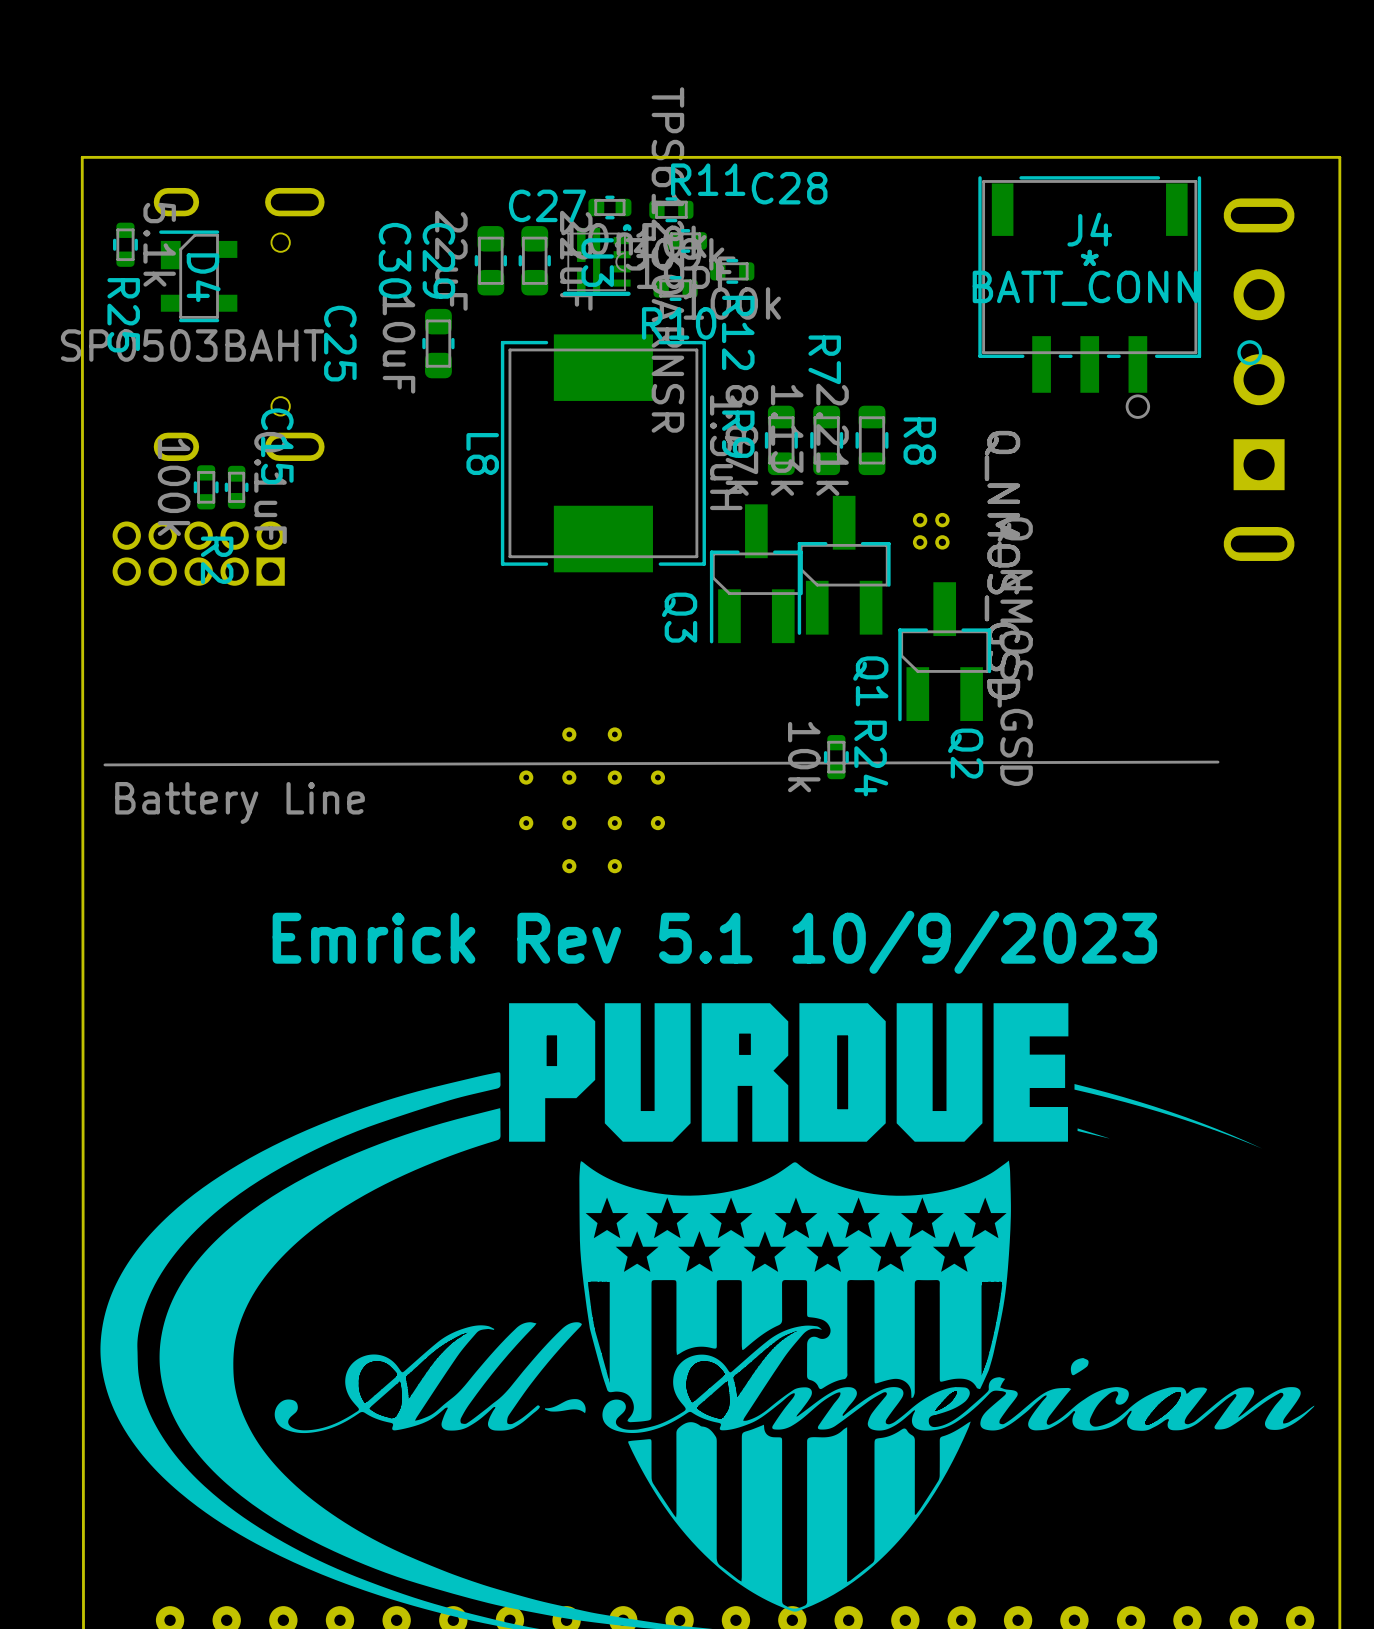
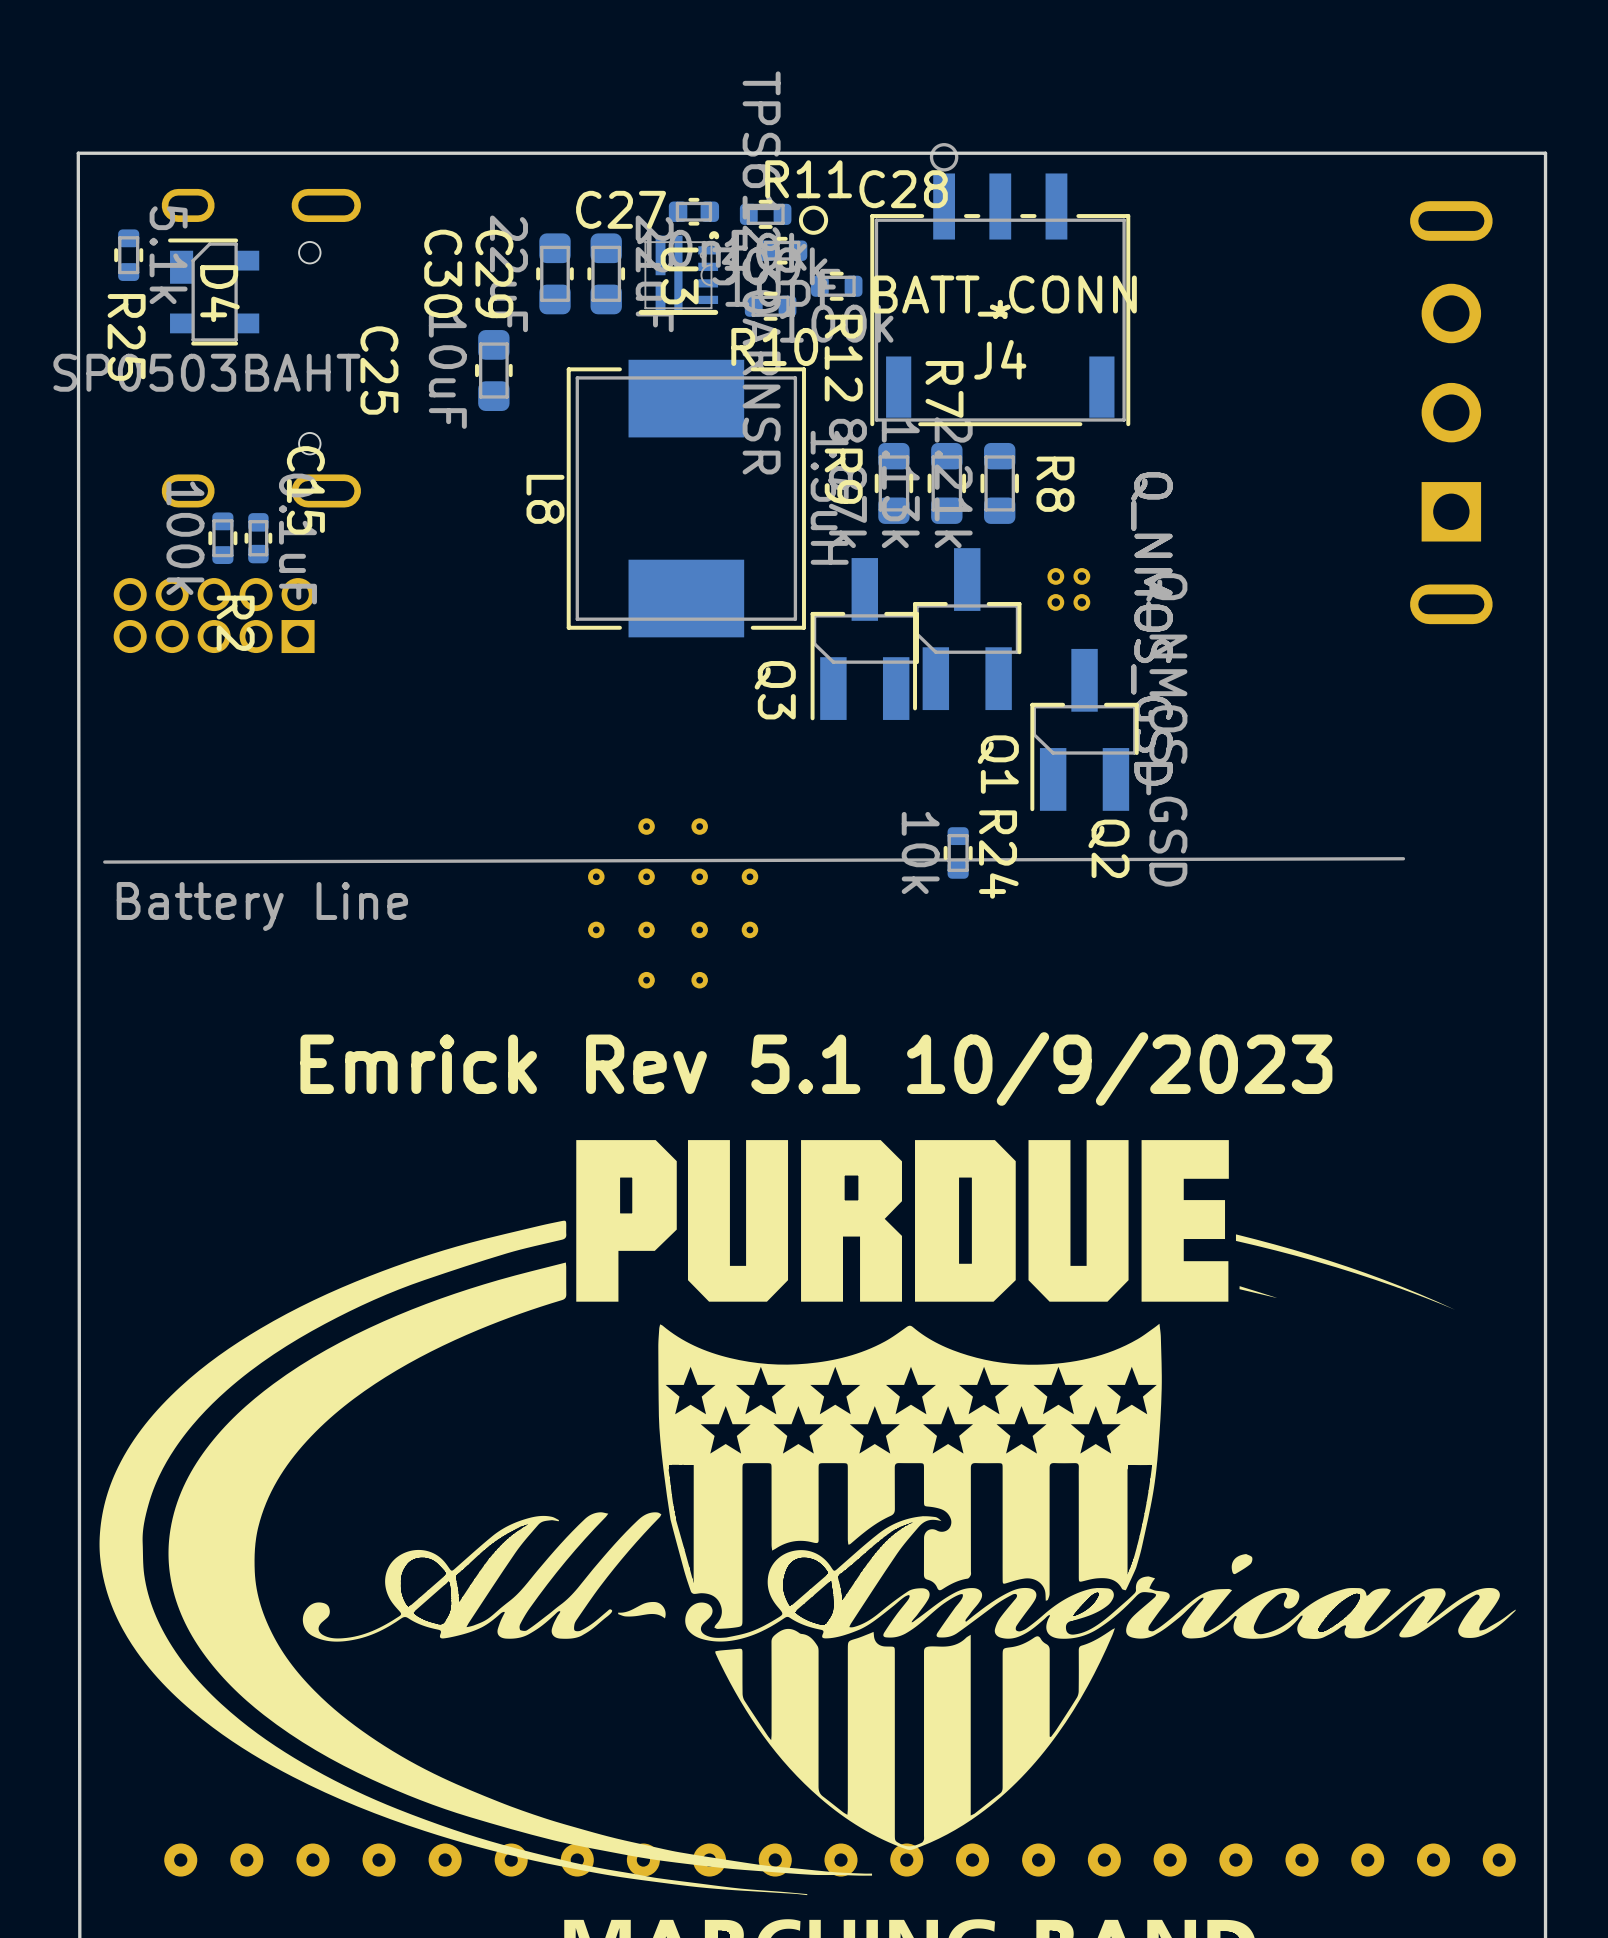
J4 rotation: 0° (1120, 297) -> 180° (964, 284)
J4 position: (1120, 297) -> (964, 284)

